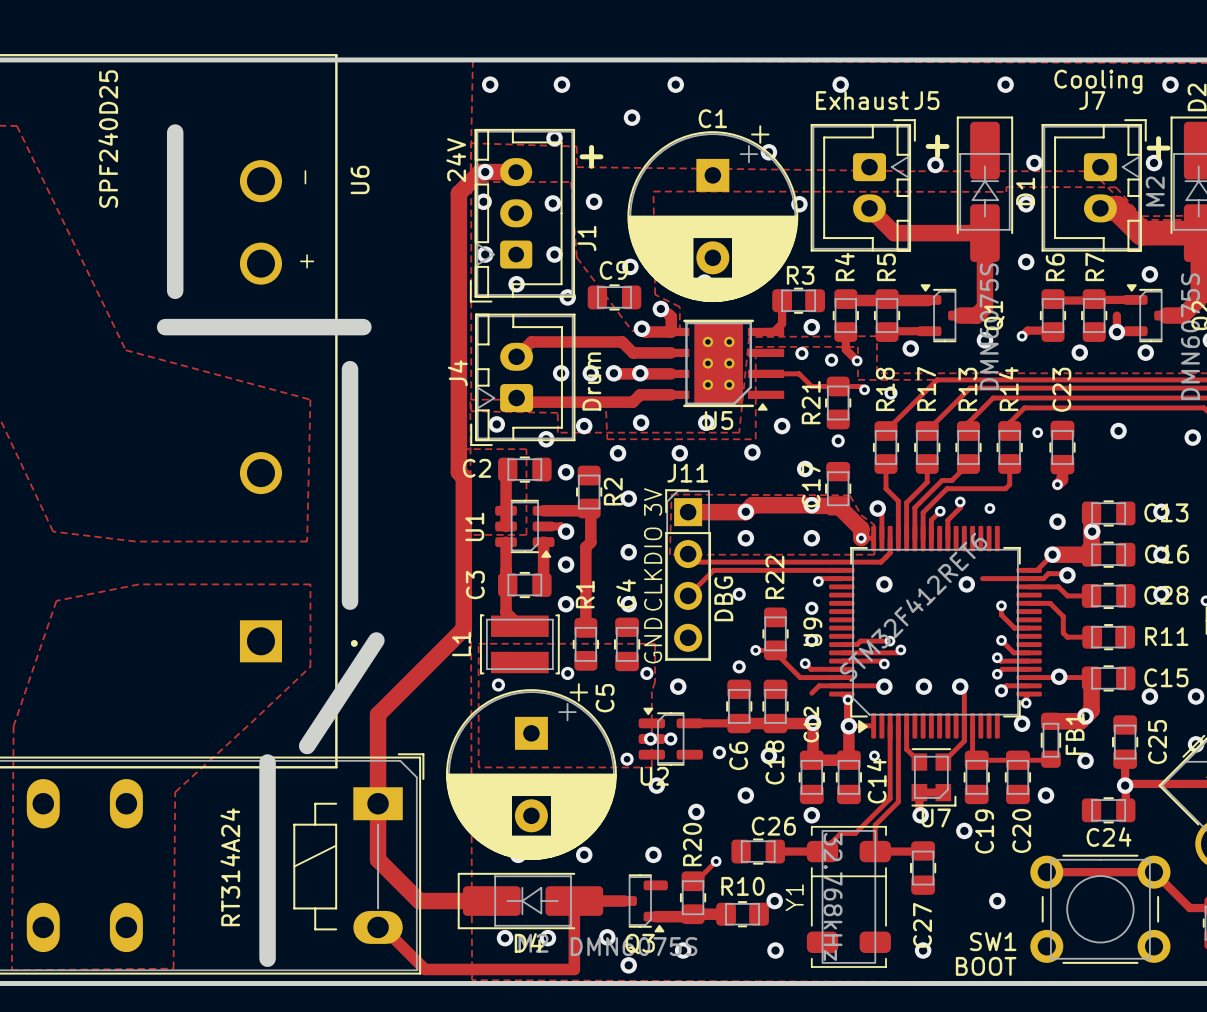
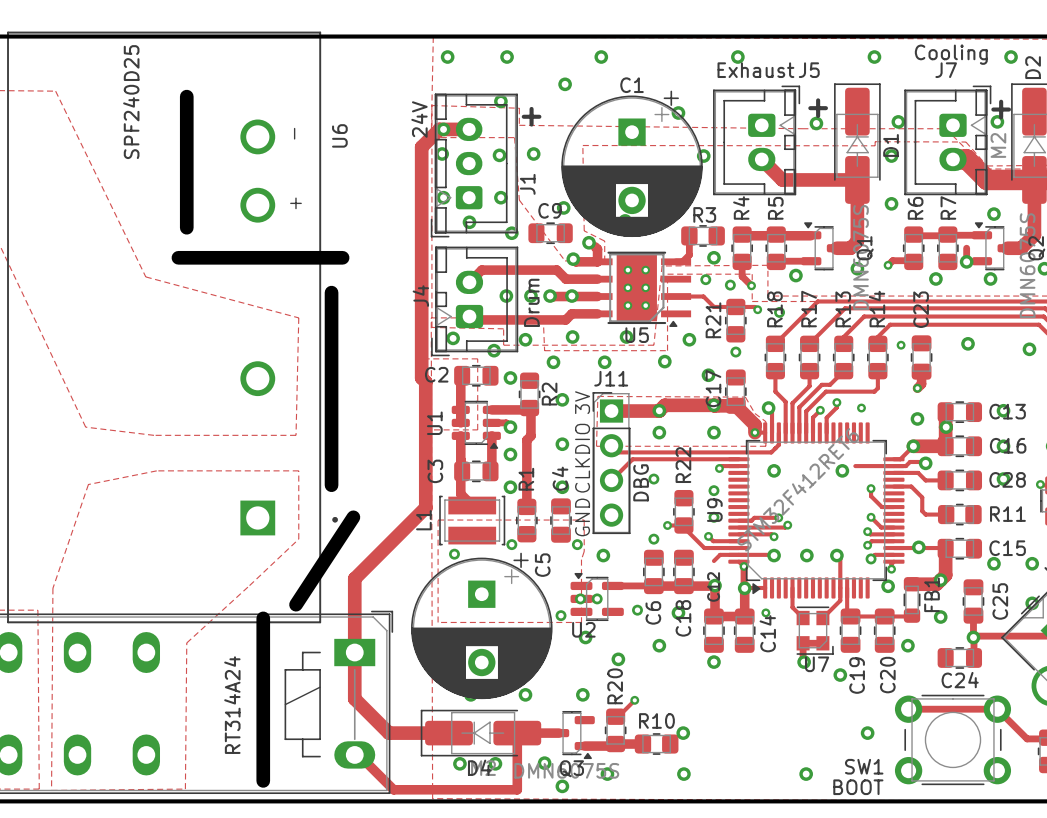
track: (890, 725) (890, 798) (855, 833) (840, 833) (822, 851) (775, 851) -> none
track: (898, 725) (898, 802) (875, 825) (875, 851) (923, 850) -> none
C26: (758, 851) -> none
C27: (923, 868) -> none
Y1: 32.768kHz (848, 896) -> none

